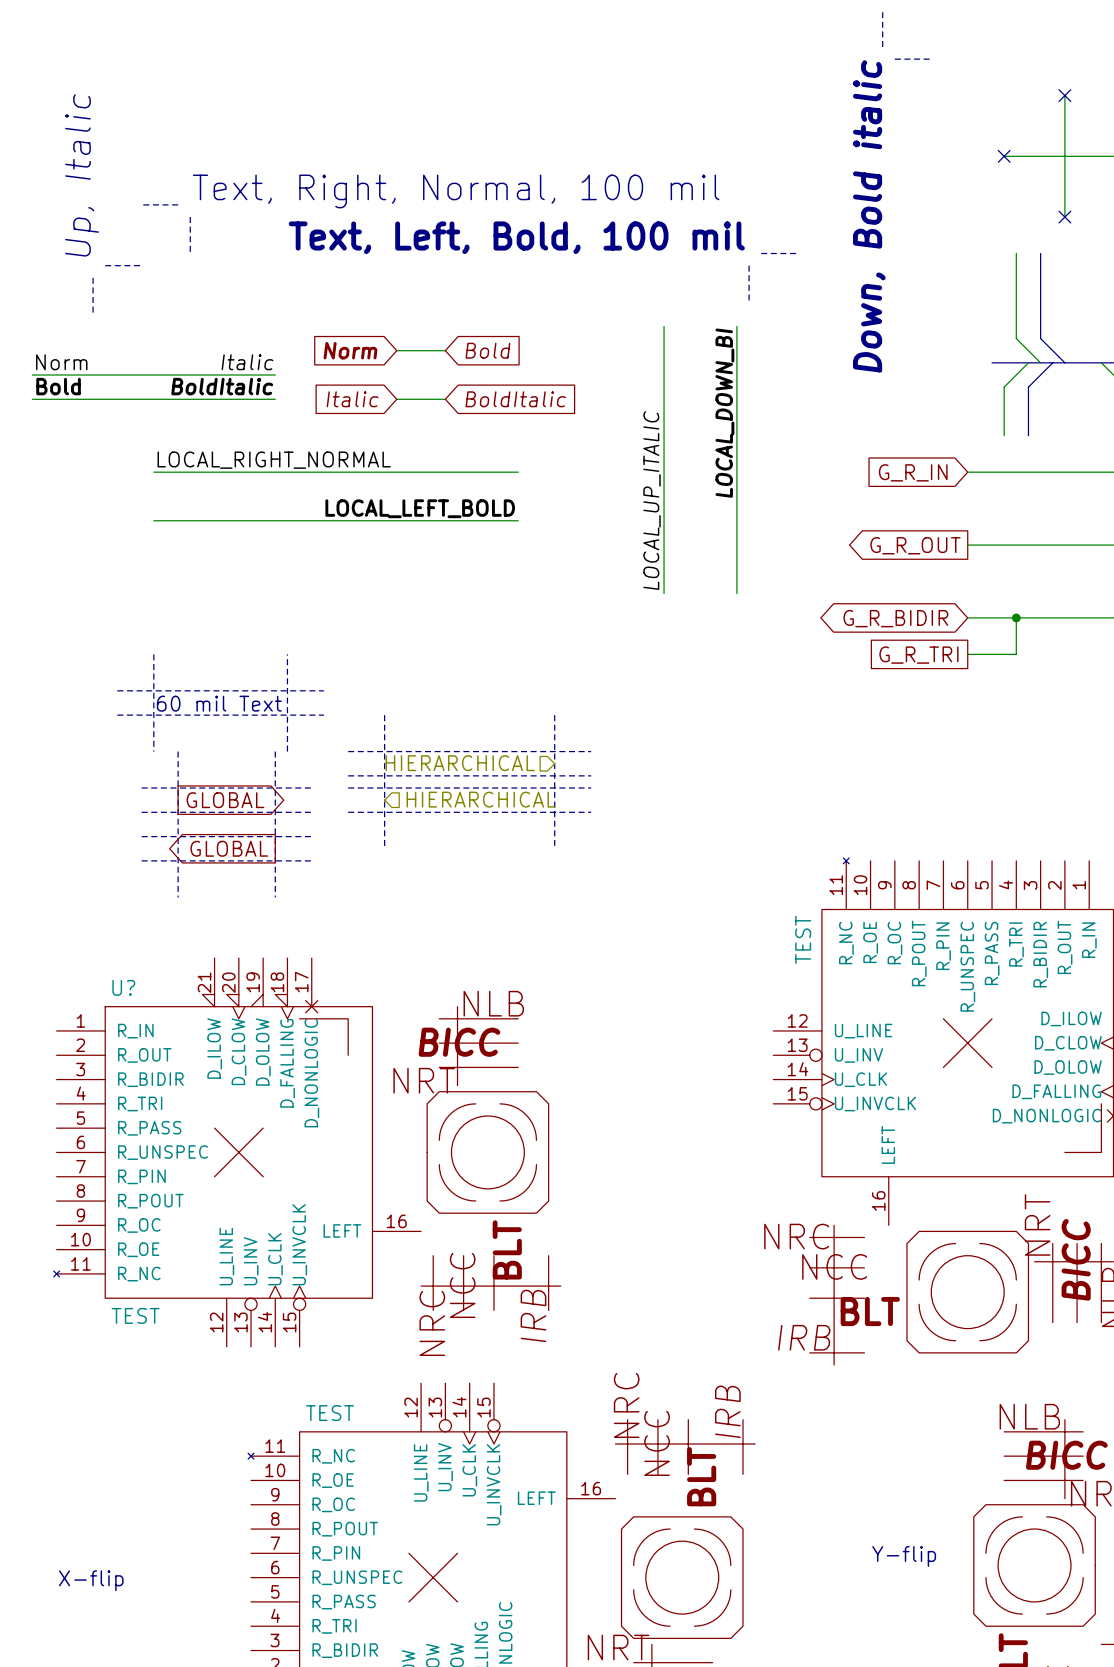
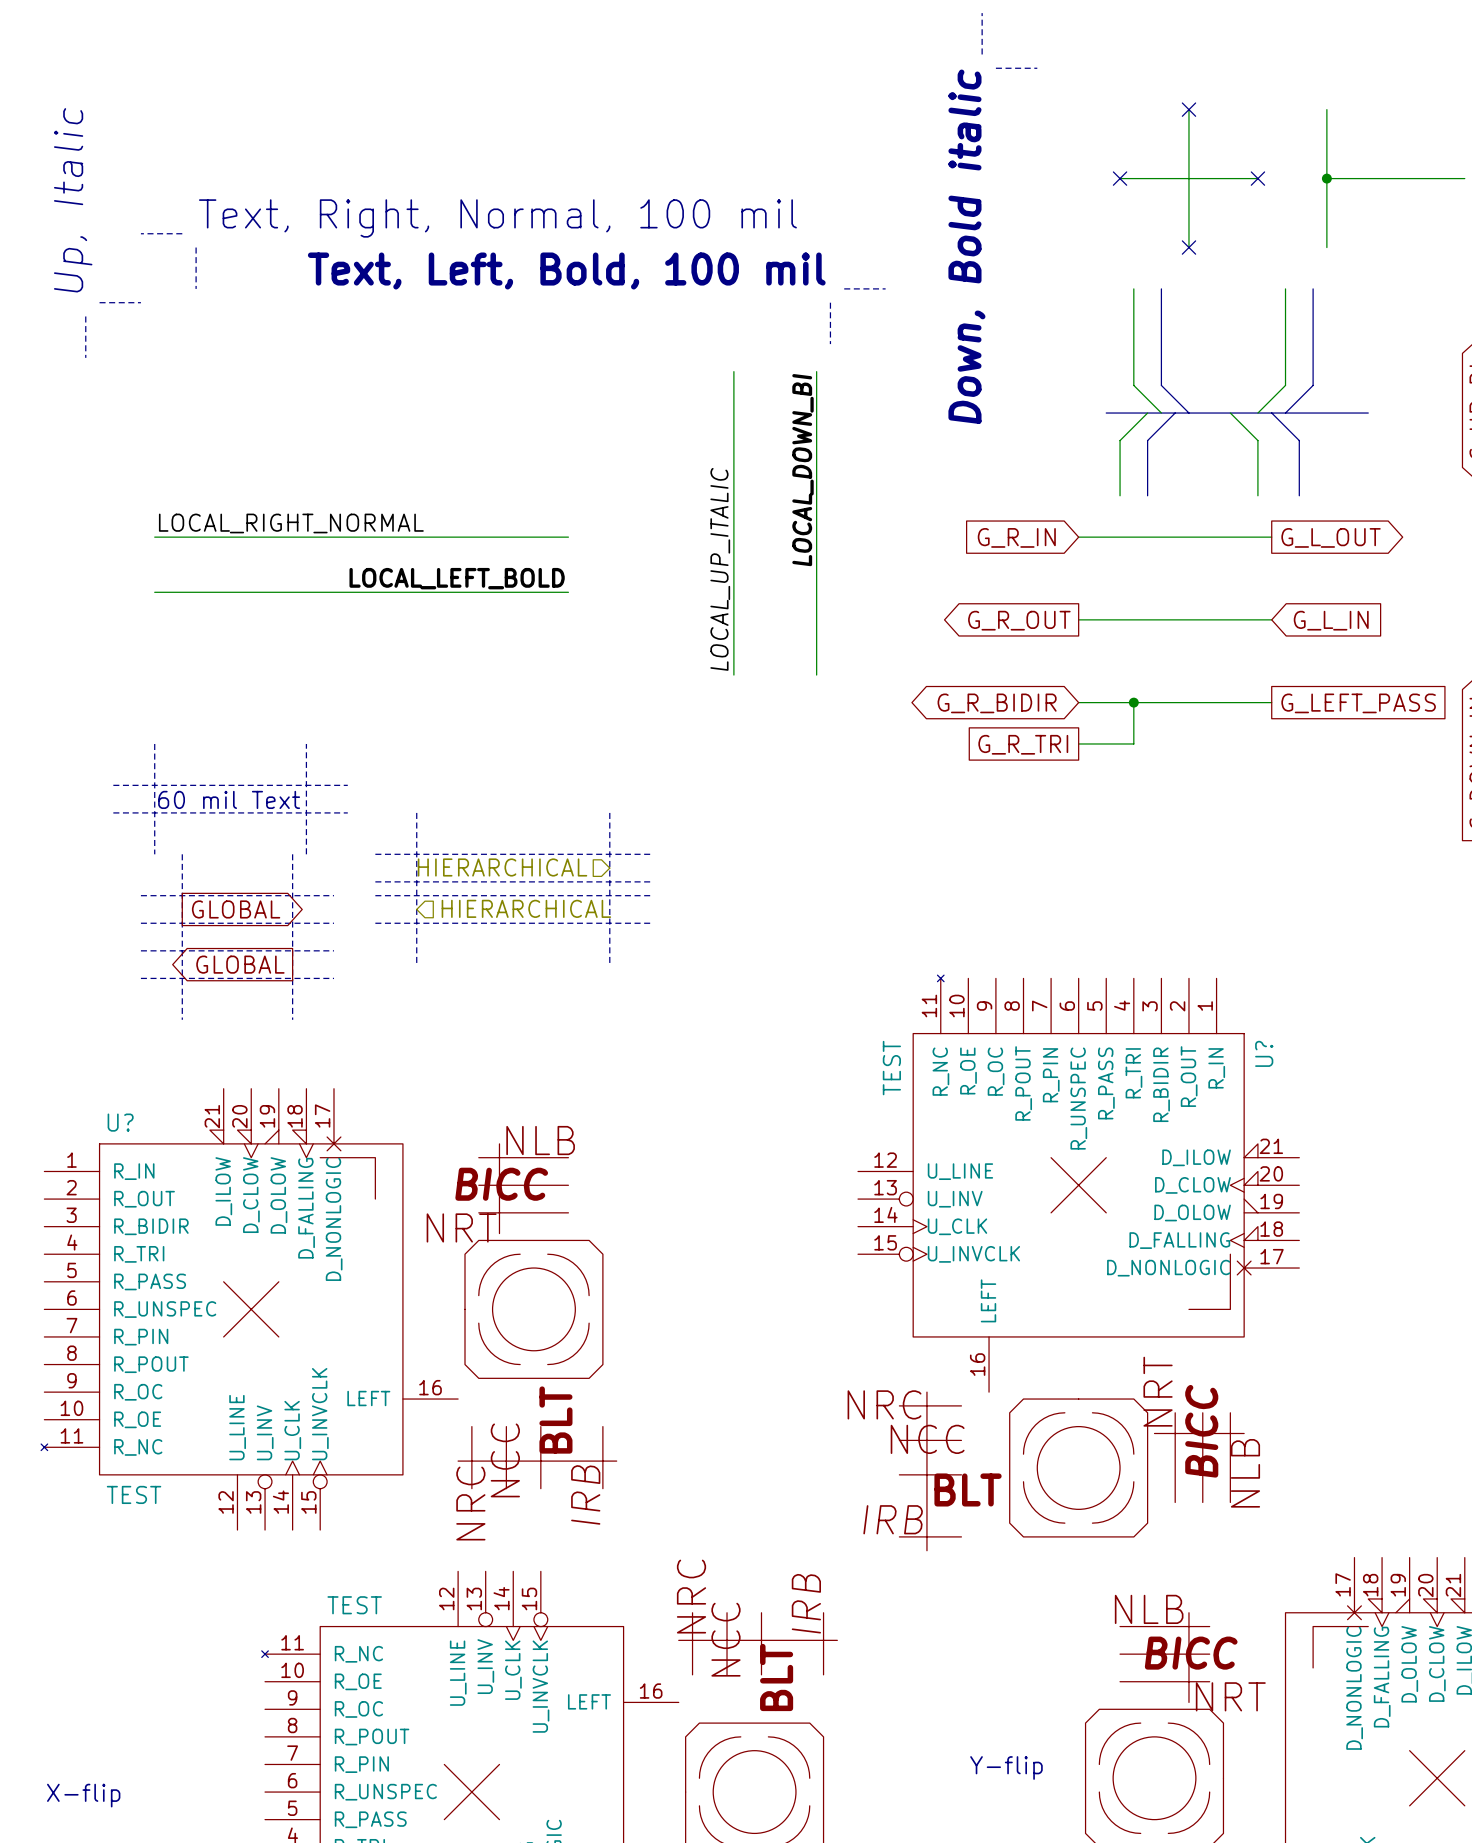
global label: Norm (350, 350) -> none
wire: (396, 350) (445, 350) -> none
global label: Bold (487, 350) -> none
label: Norm (61, 362) -> none
label: Italic (247, 362) -> none
wire: (32, 374) (275, 374) -> none
label: Bold (58, 386) -> none
label: BoldItalic (222, 386) -> none
wire: (32, 399) (275, 399) -> none
global label: Italic (352, 399) -> none
wire: (396, 399) (445, 399) -> none
global label: BoldItalic (515, 399) -> none

